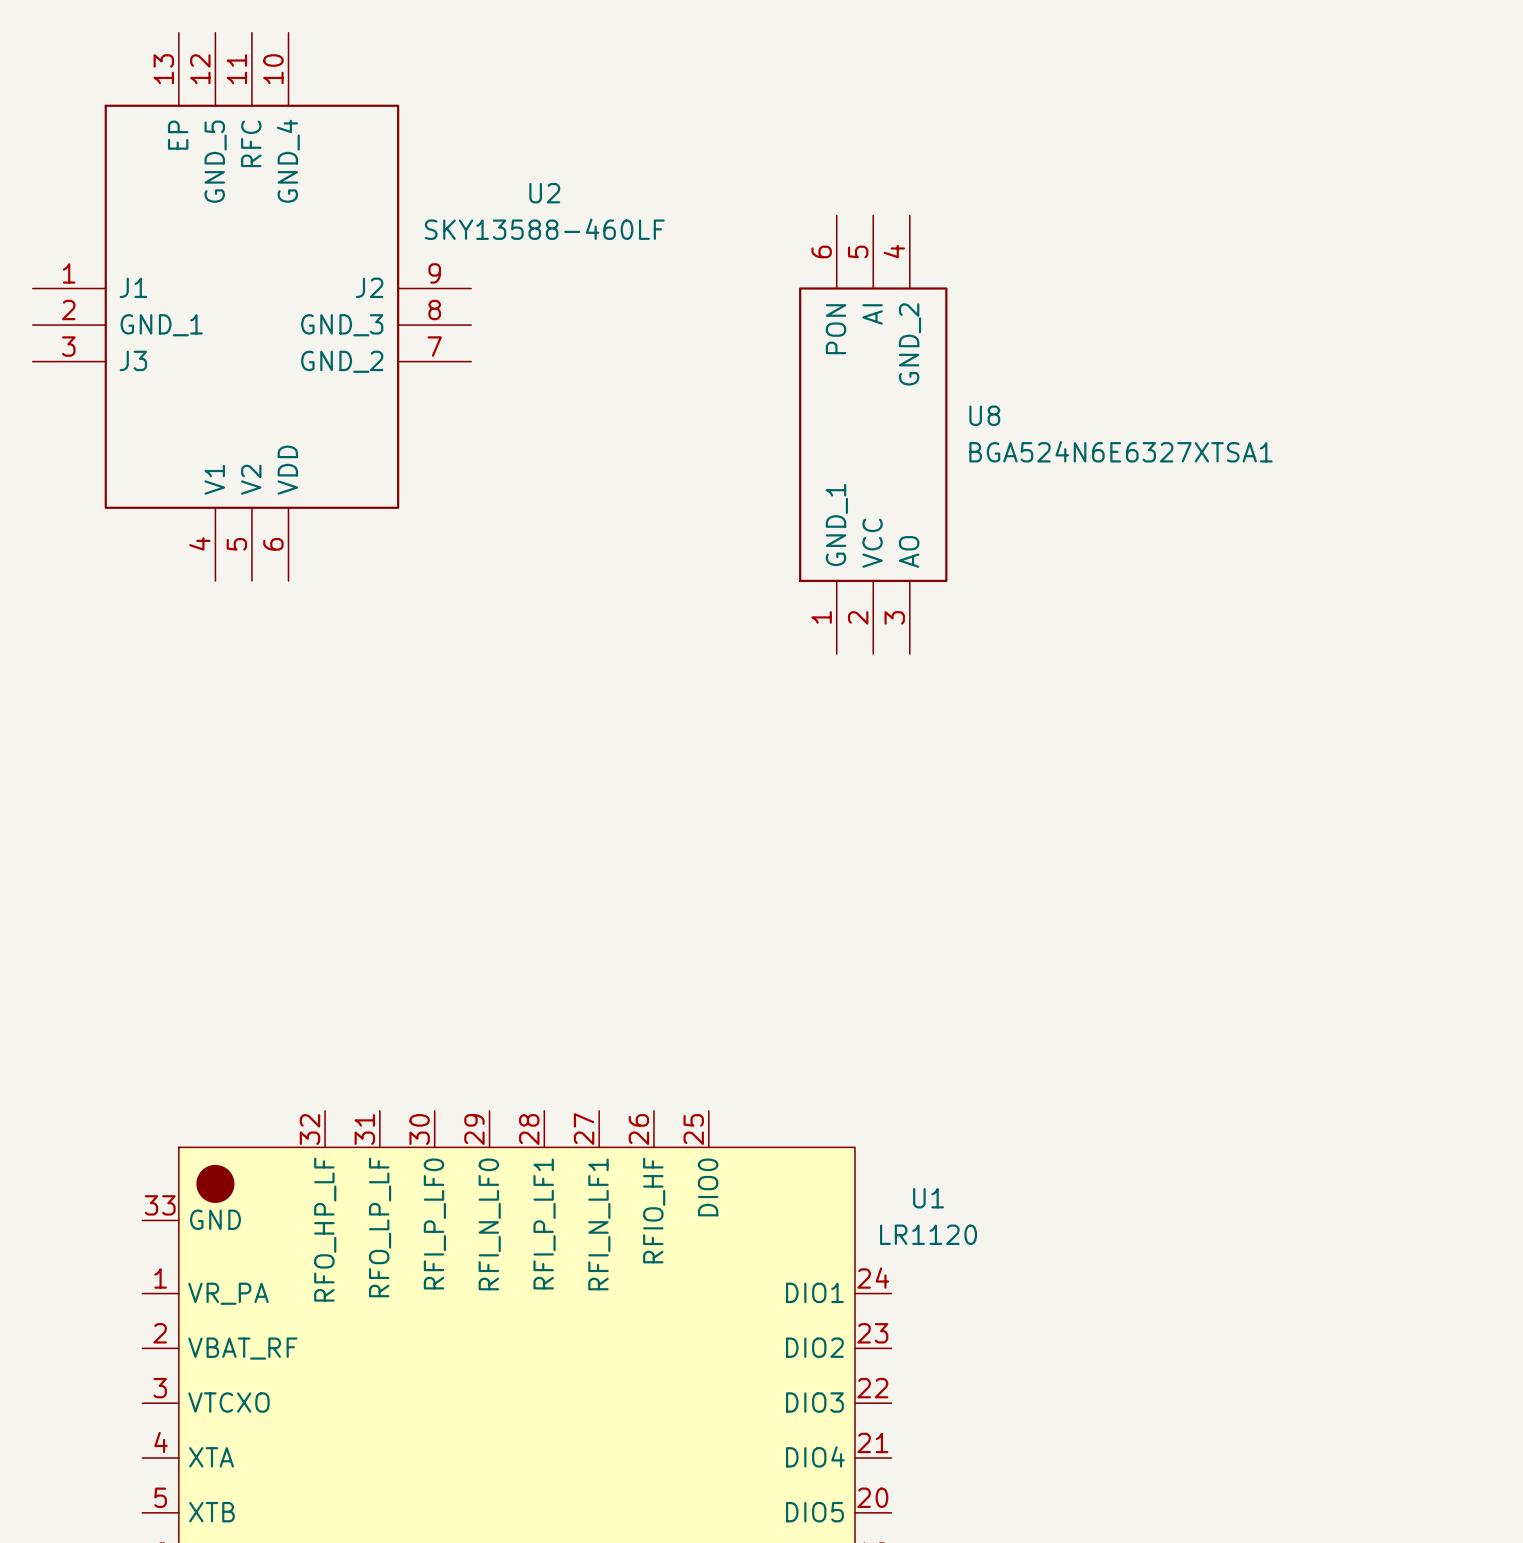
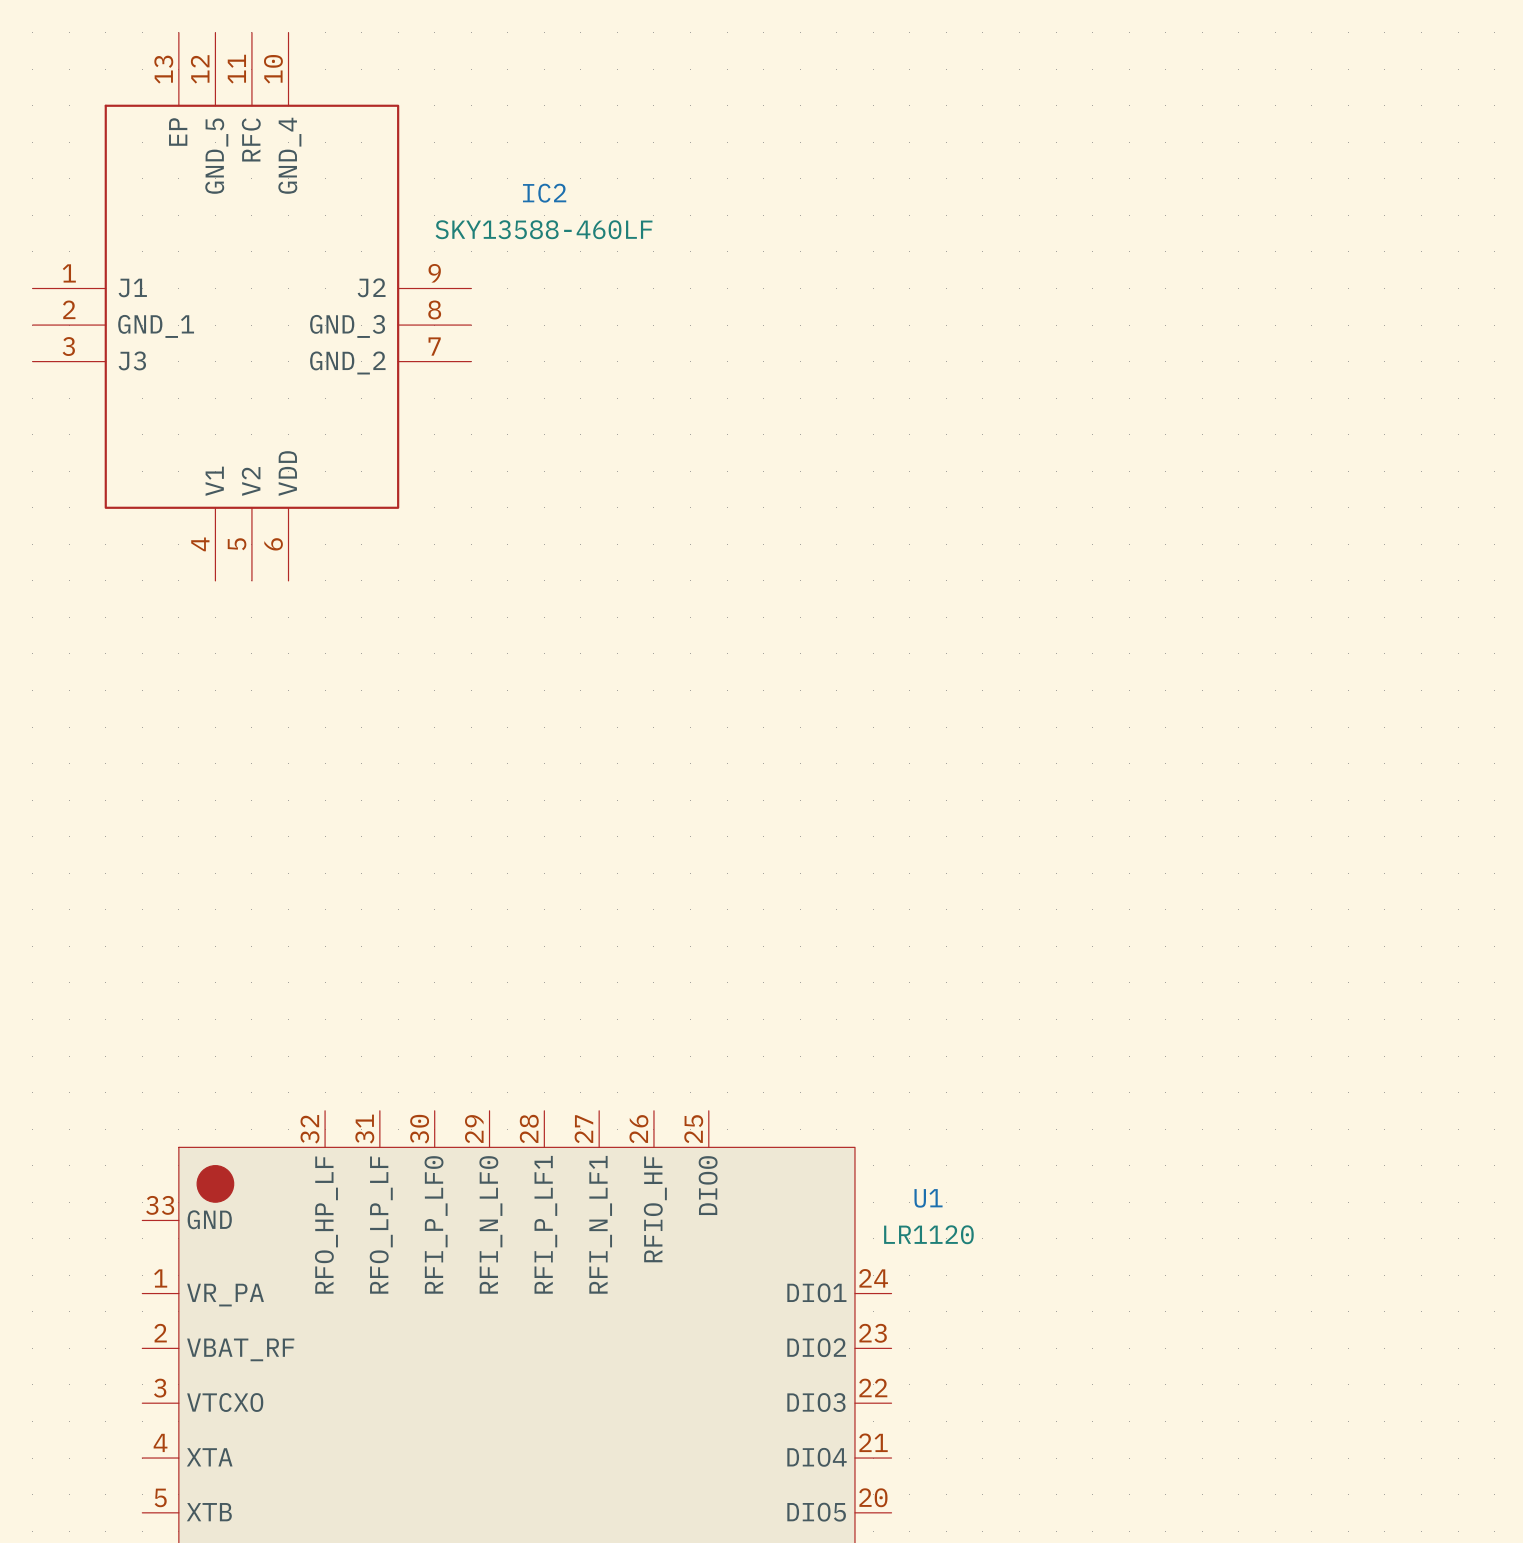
U2 name: U2 (544, 193) -> IC2 (544, 193)
U8: BGA524N6E6327XTSA1 (873, 434) -> none

